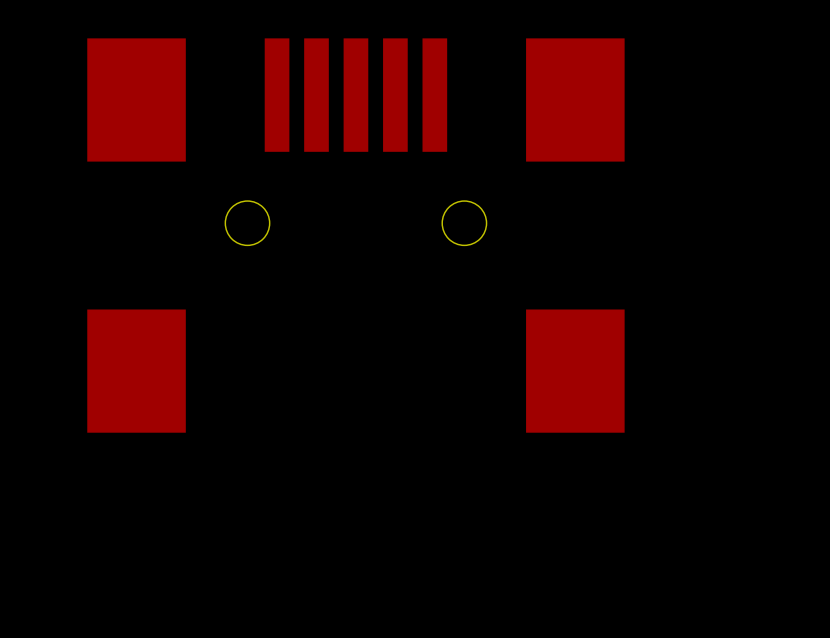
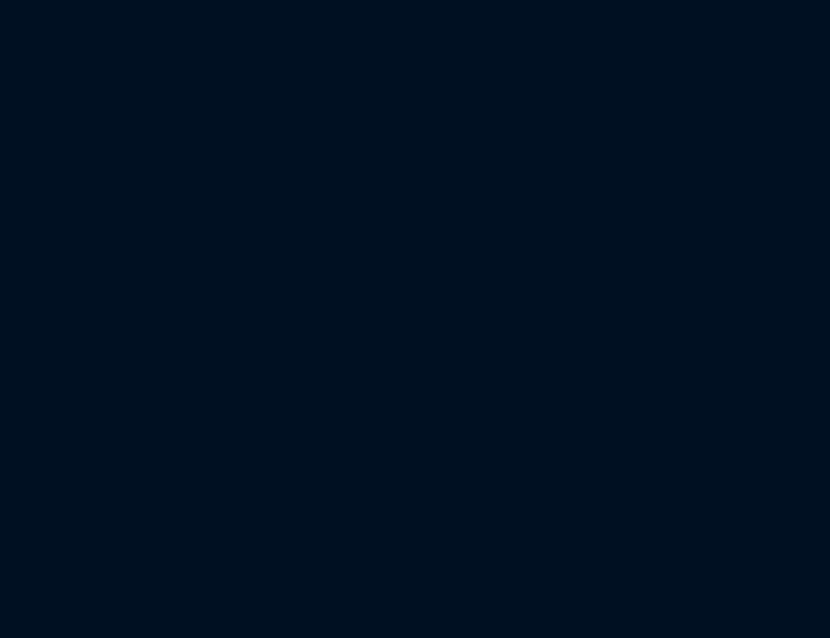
part: (355, 235) -> none

